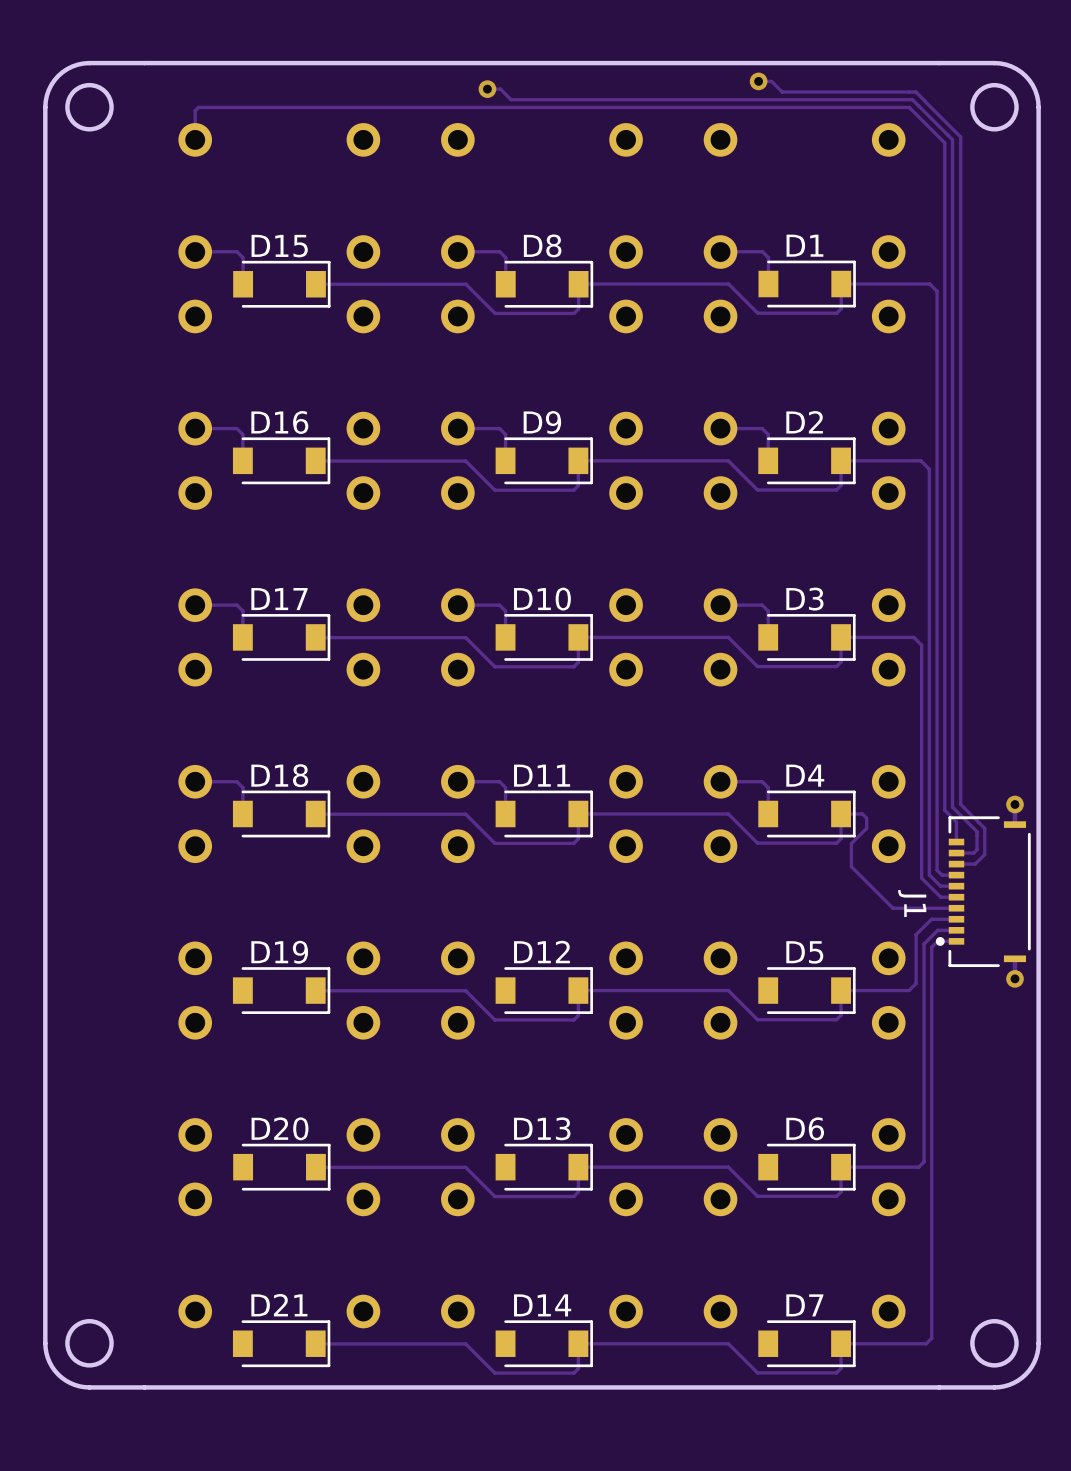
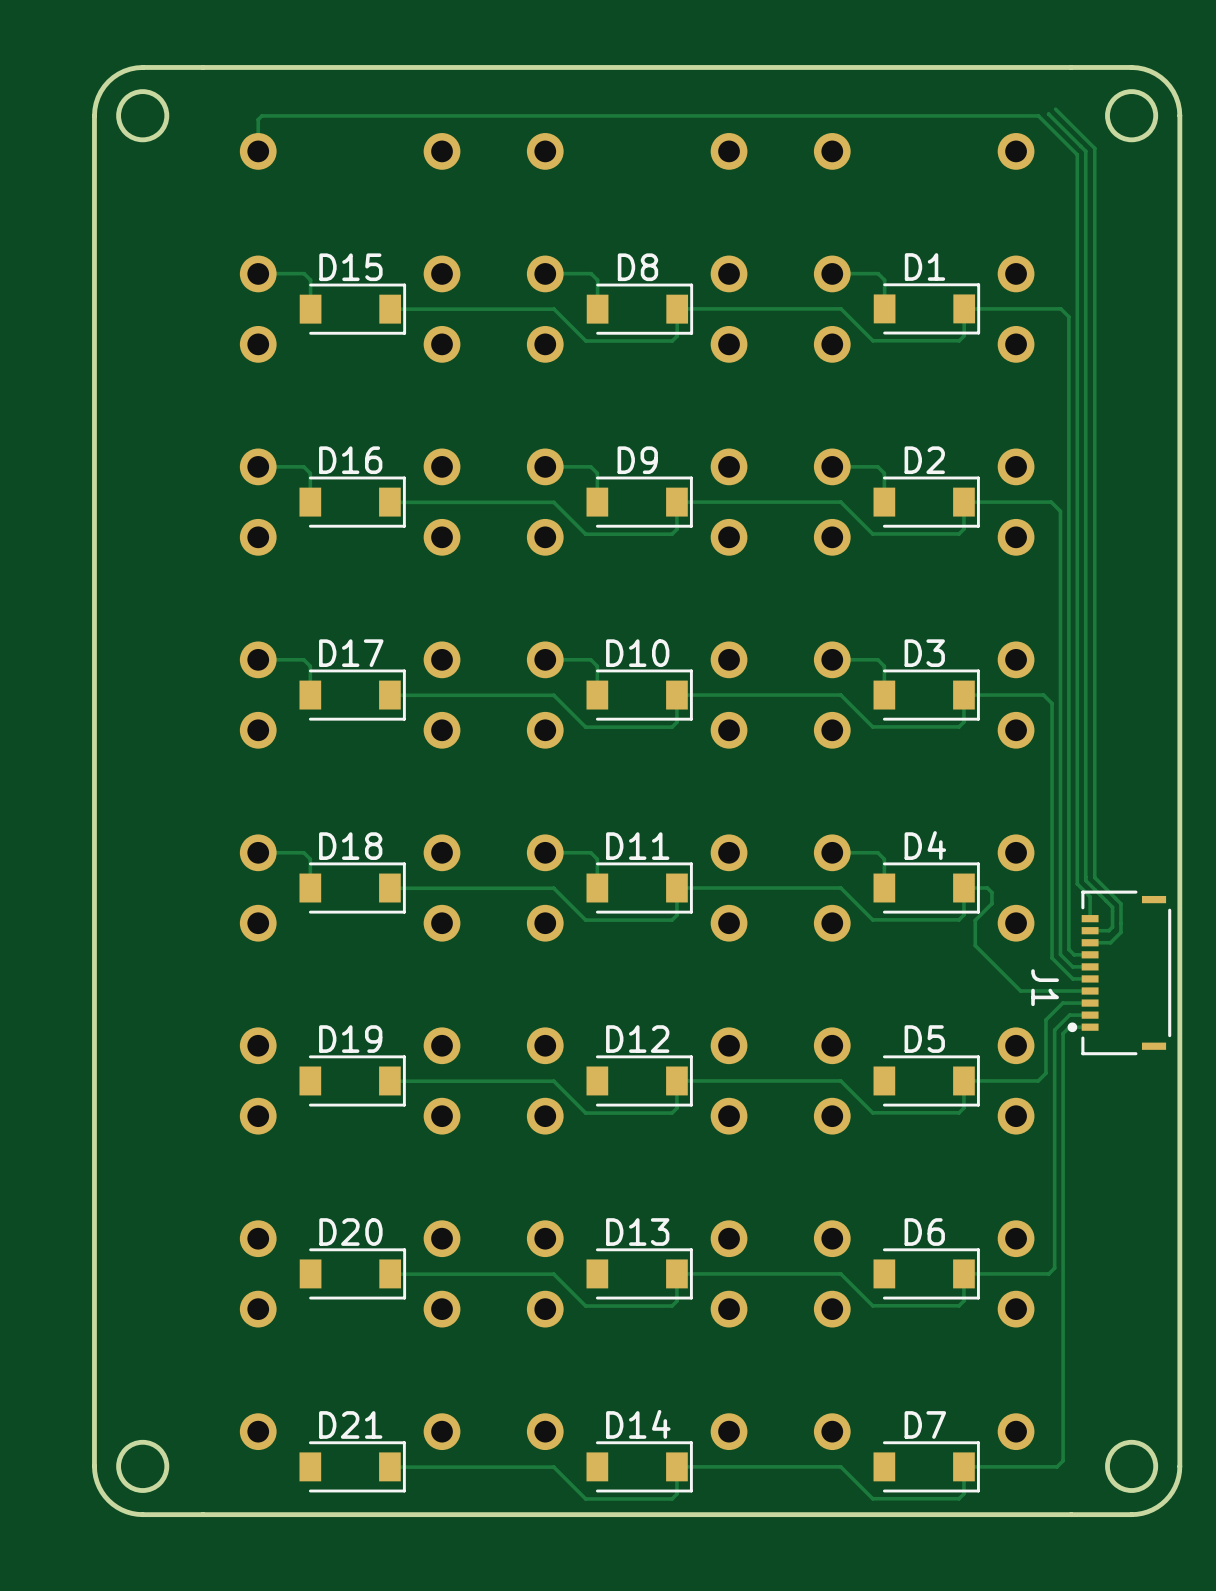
track: (758, 81) (771, 81) (782, 92) (915, 92) (924, 101) -> none
via: (758, 81) -> none
track: (487, 89) (500, 89) (511, 99) (912, 99) (918, 105) -> none
via: (487, 89) -> none
via: (1014, 804) -> none
track: (1014, 808) (1014, 824) -> none
track: (1014, 958) (1014, 974) -> none
via: (1014, 978) -> none

